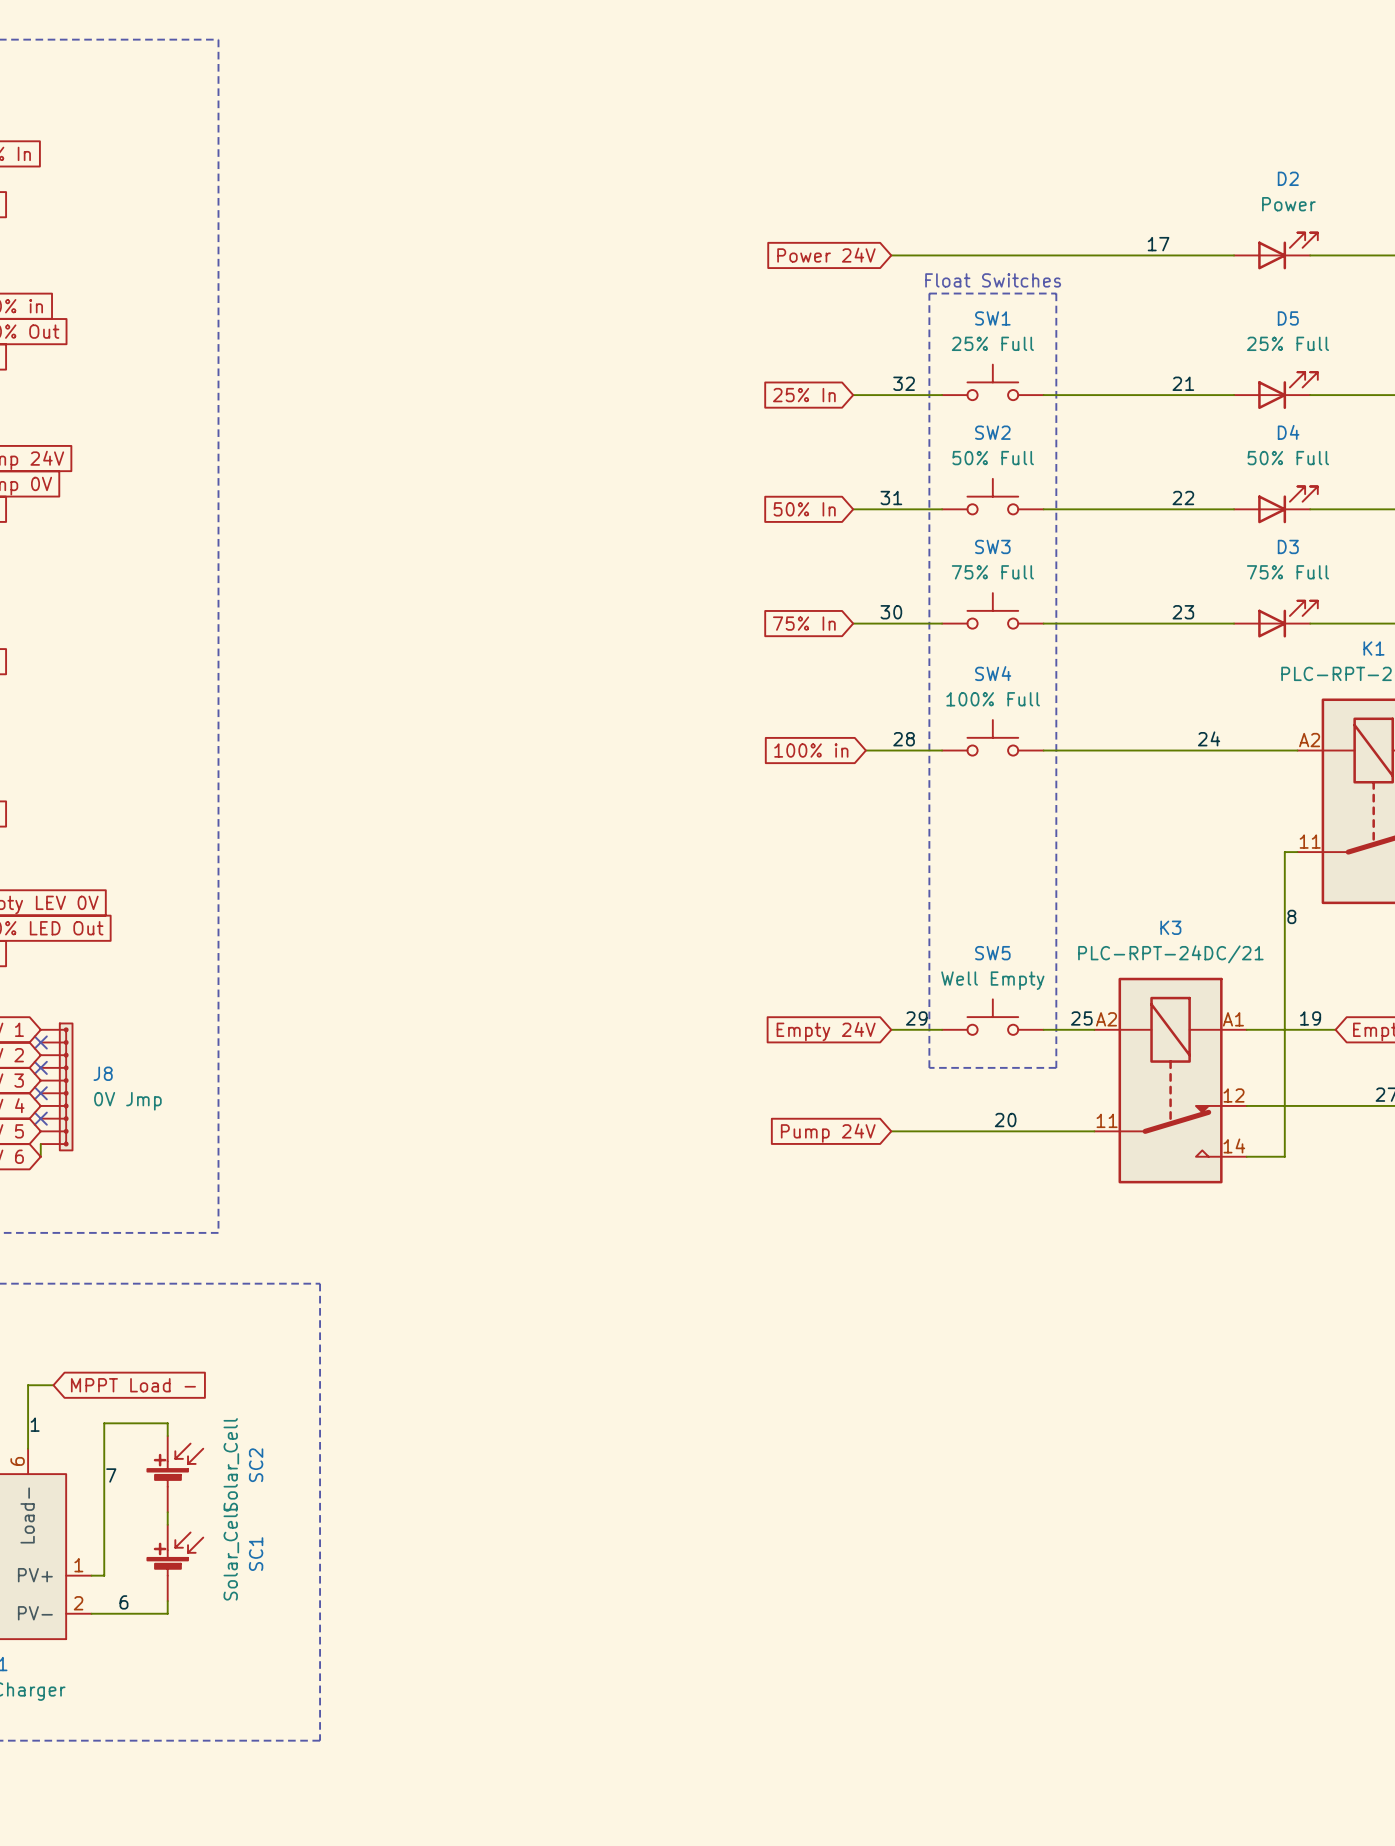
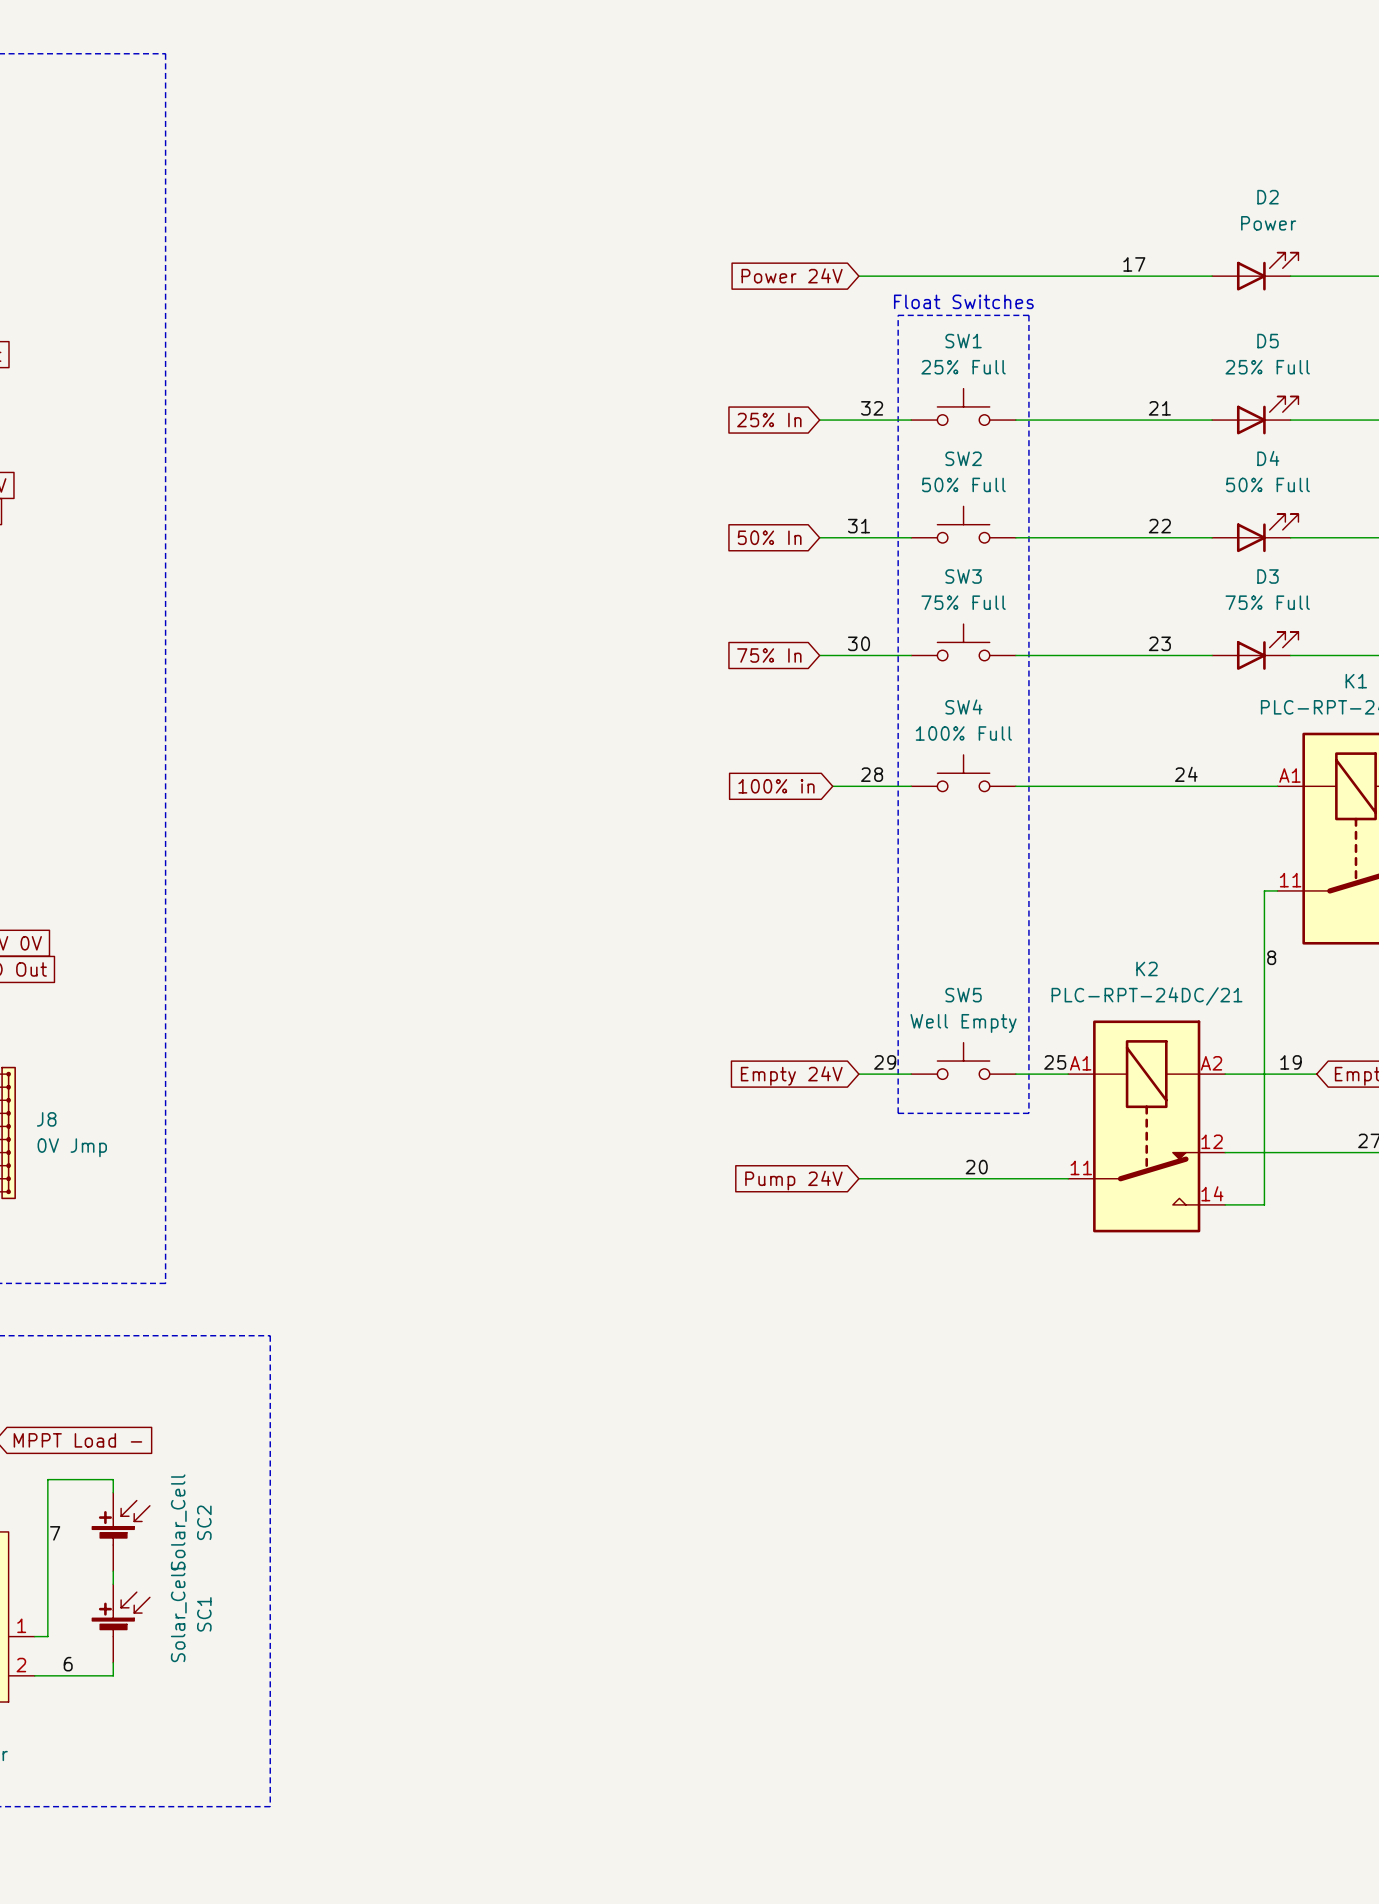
K1 pin number: A2 (1309, 740) -> A1 (1289, 775)
K3 name: K3 (1170, 927) -> K2 (1147, 968)
K3 pin number: A2 (1106, 1019) -> A1 (1080, 1063)
K3 pin number: A1 (1233, 1019) -> A2 (1211, 1063)

